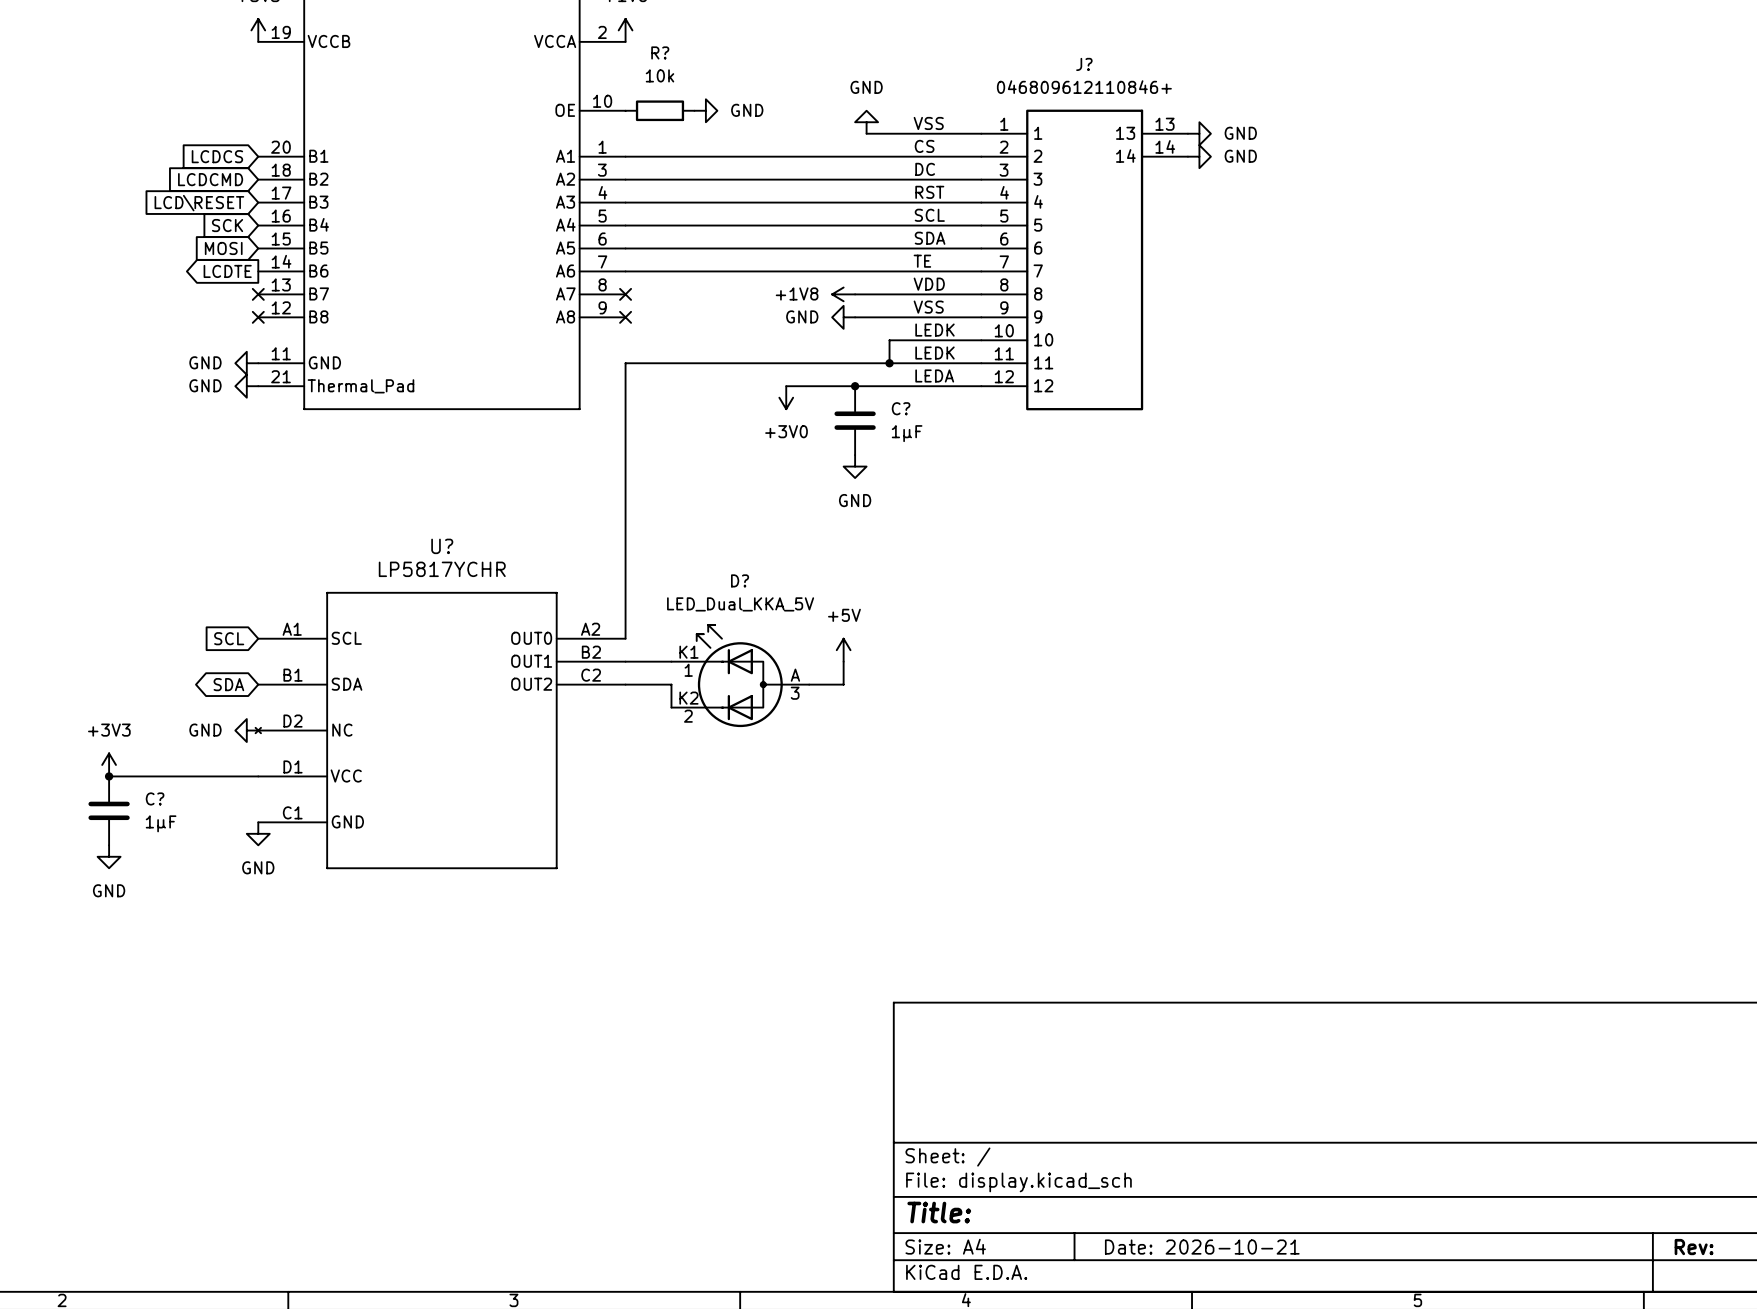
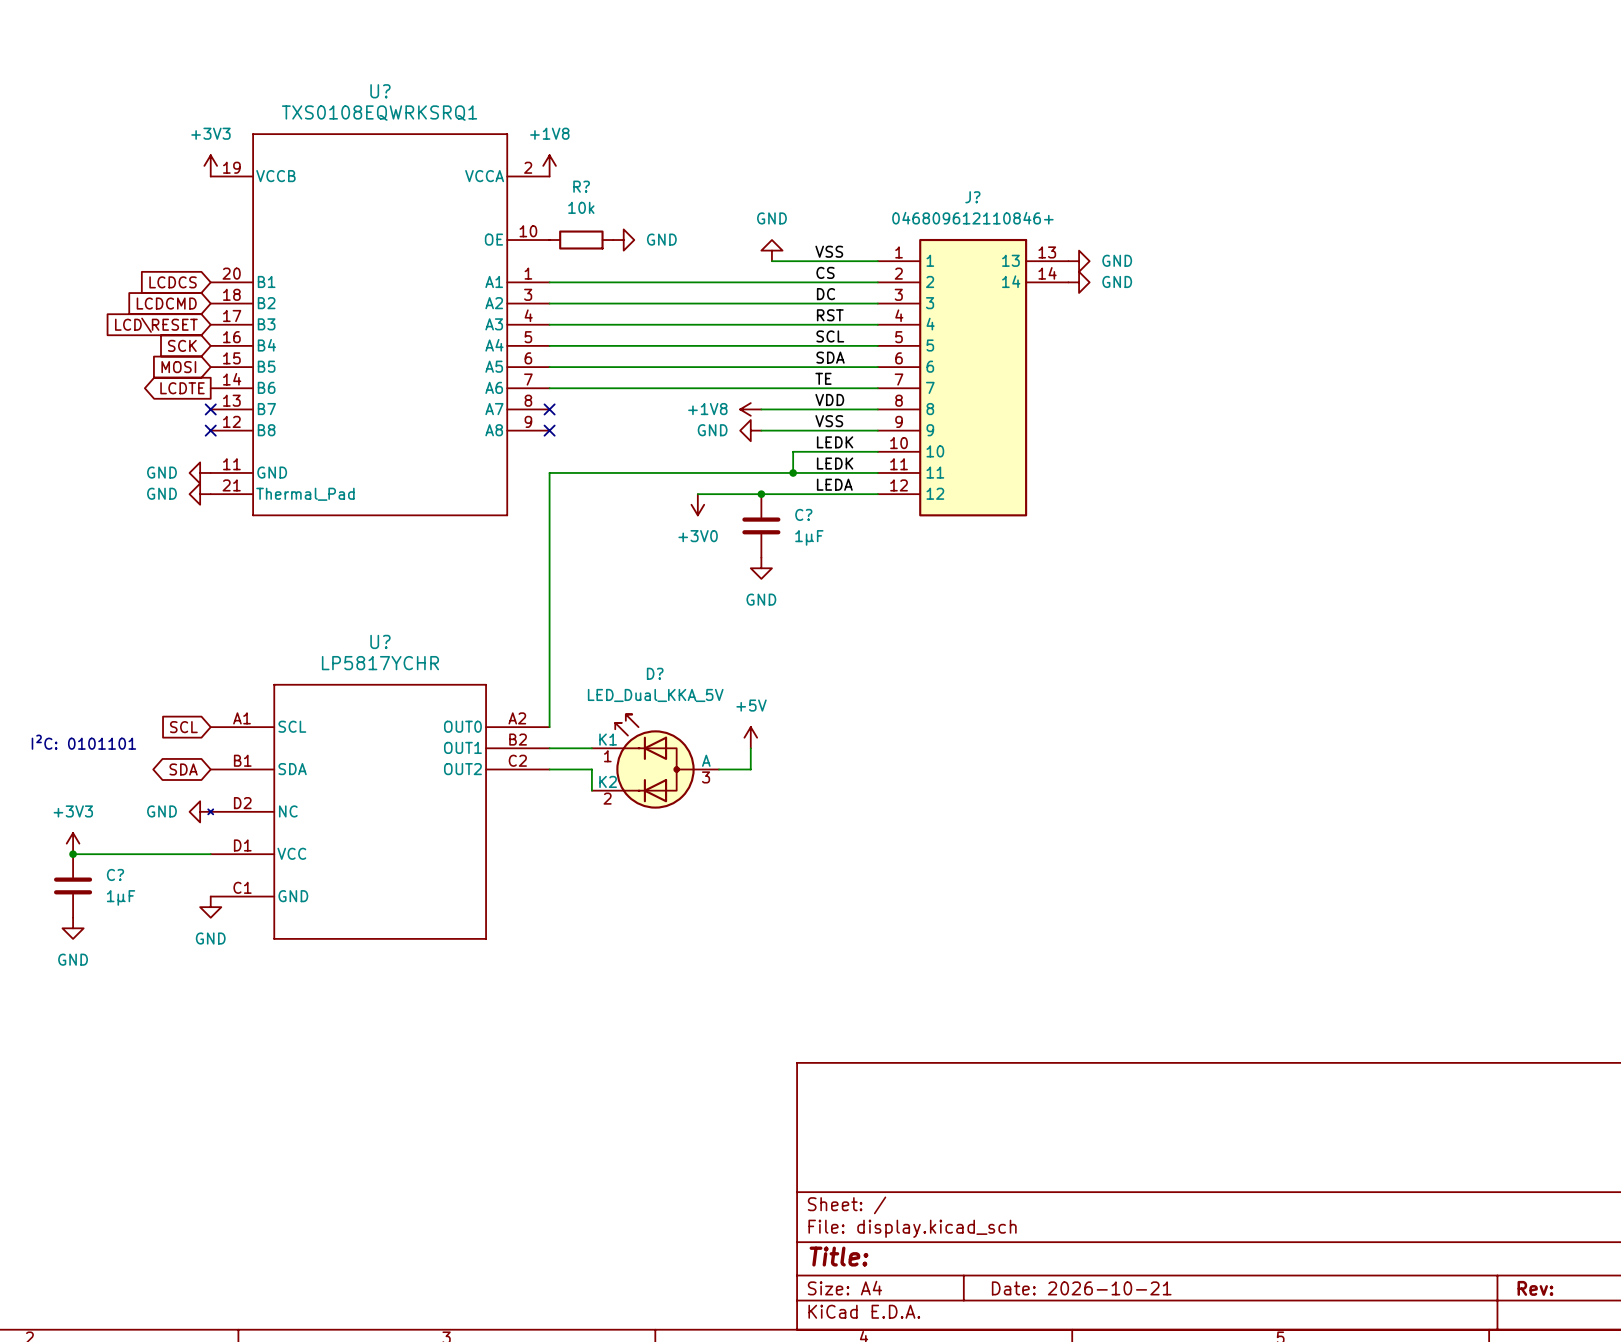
text: none -> I²C: 0101101 (83, 742)

